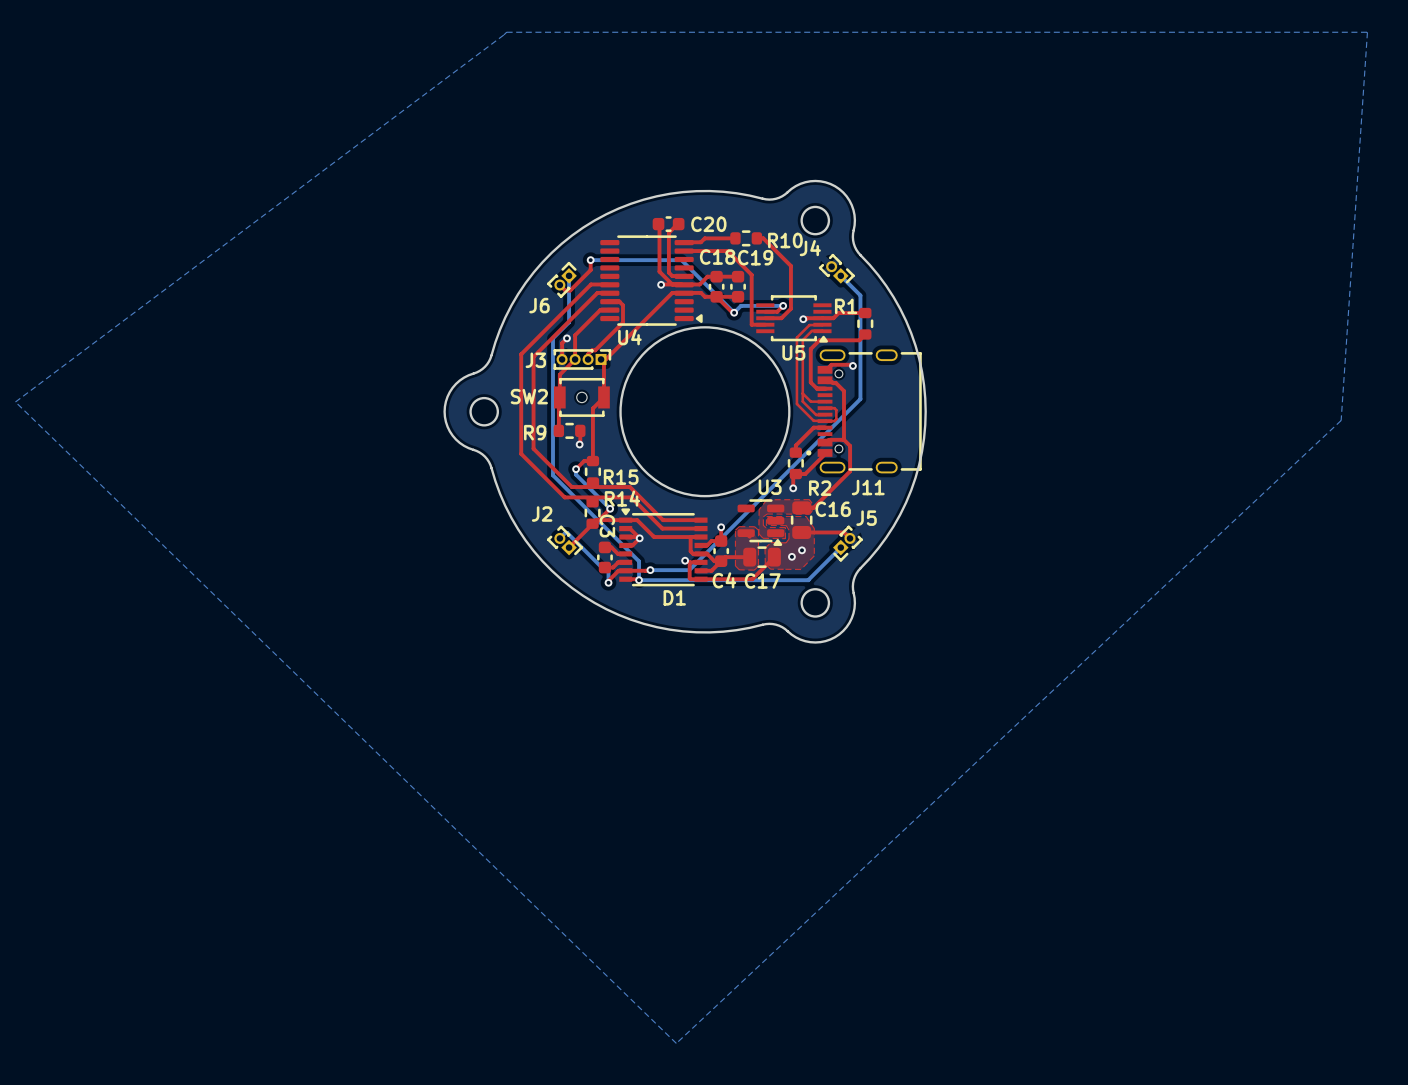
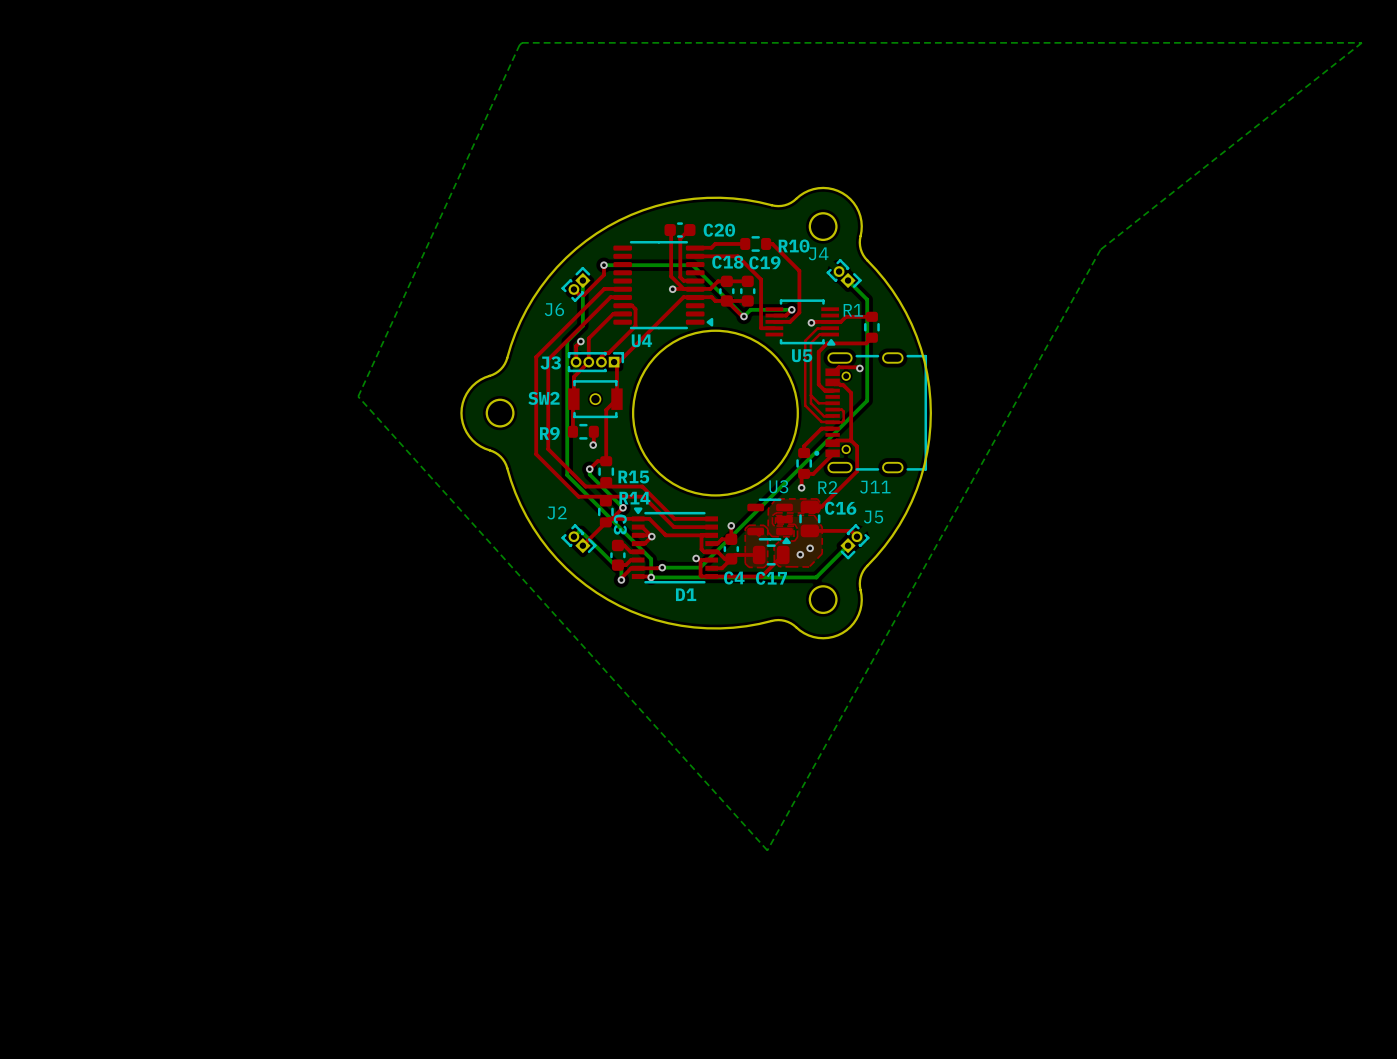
bottom zone outline: (1367, 32) (1341, 420) (676, 1043) (15, 401) (504, 34) -> (1361, 42) (1100, 249) (767, 850) (358, 396) (519, 45)

